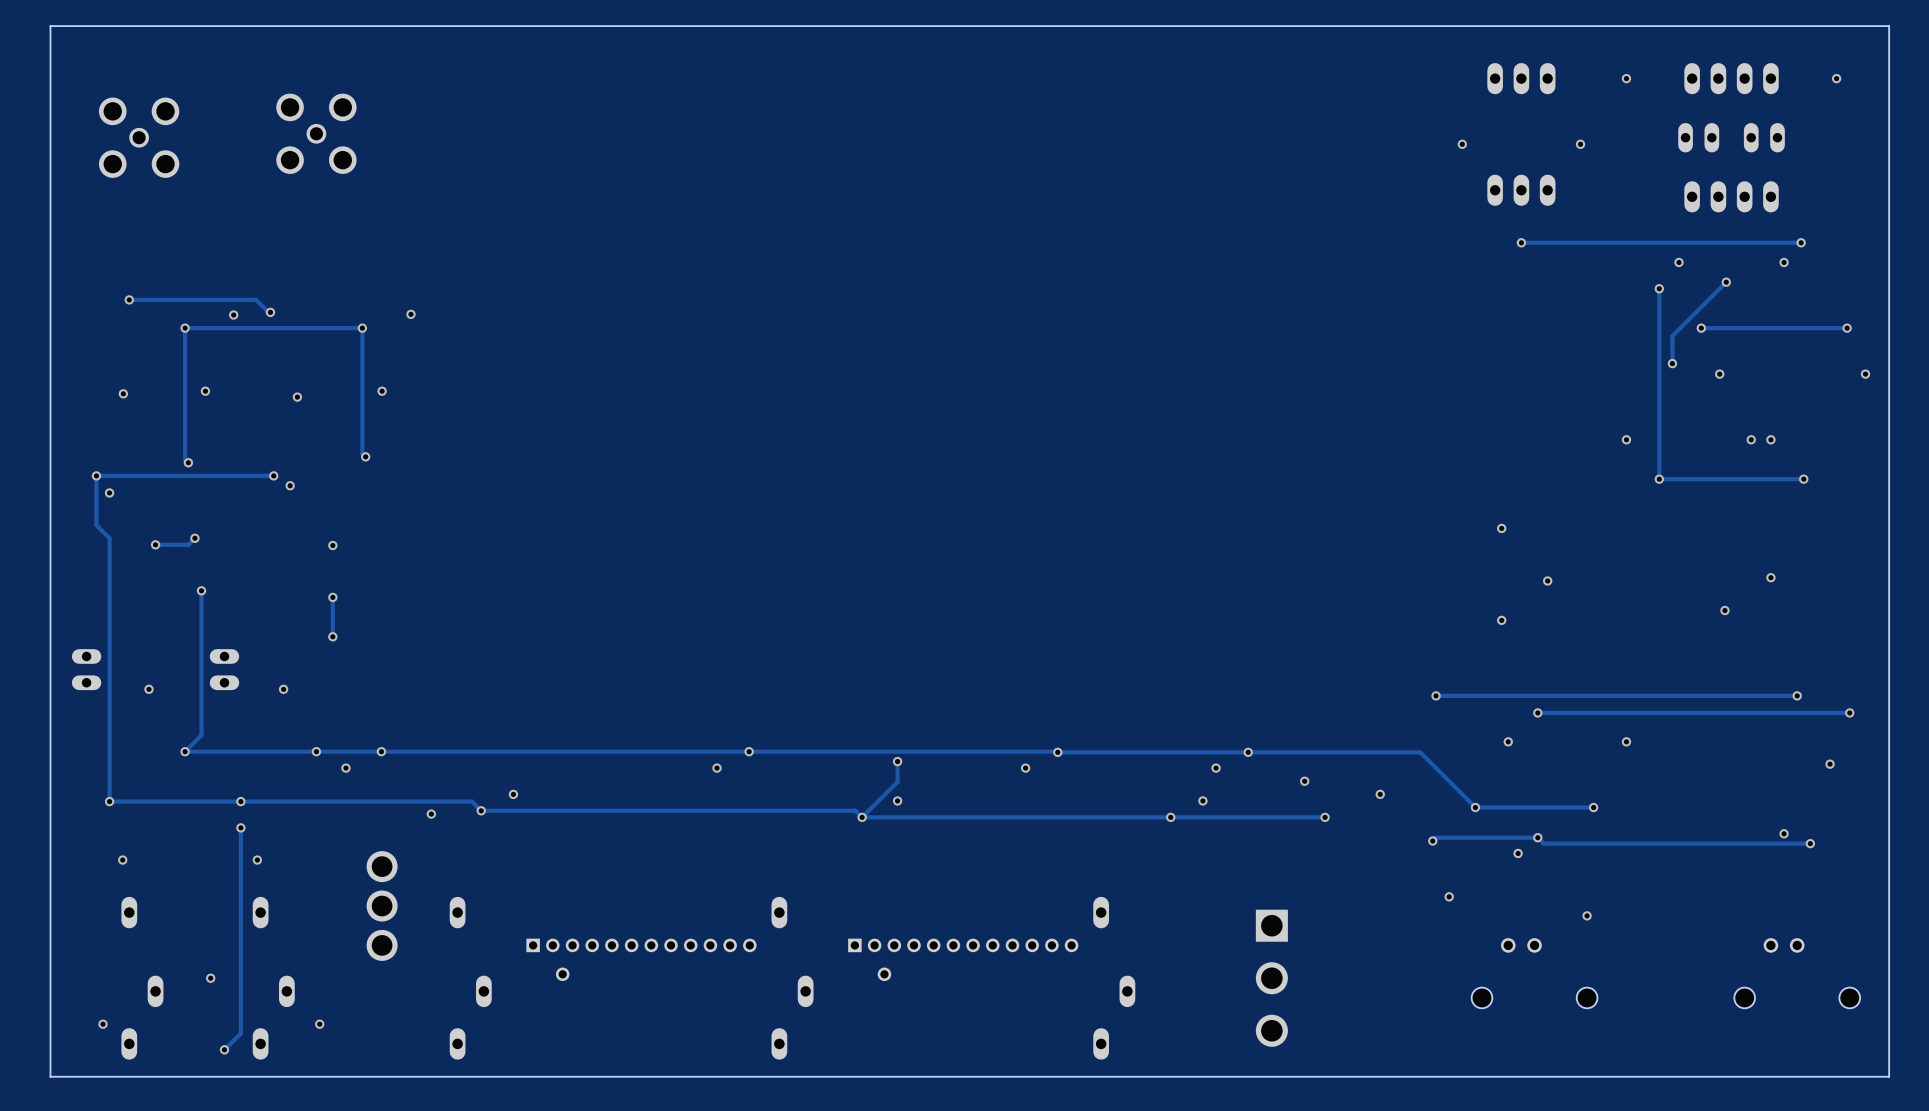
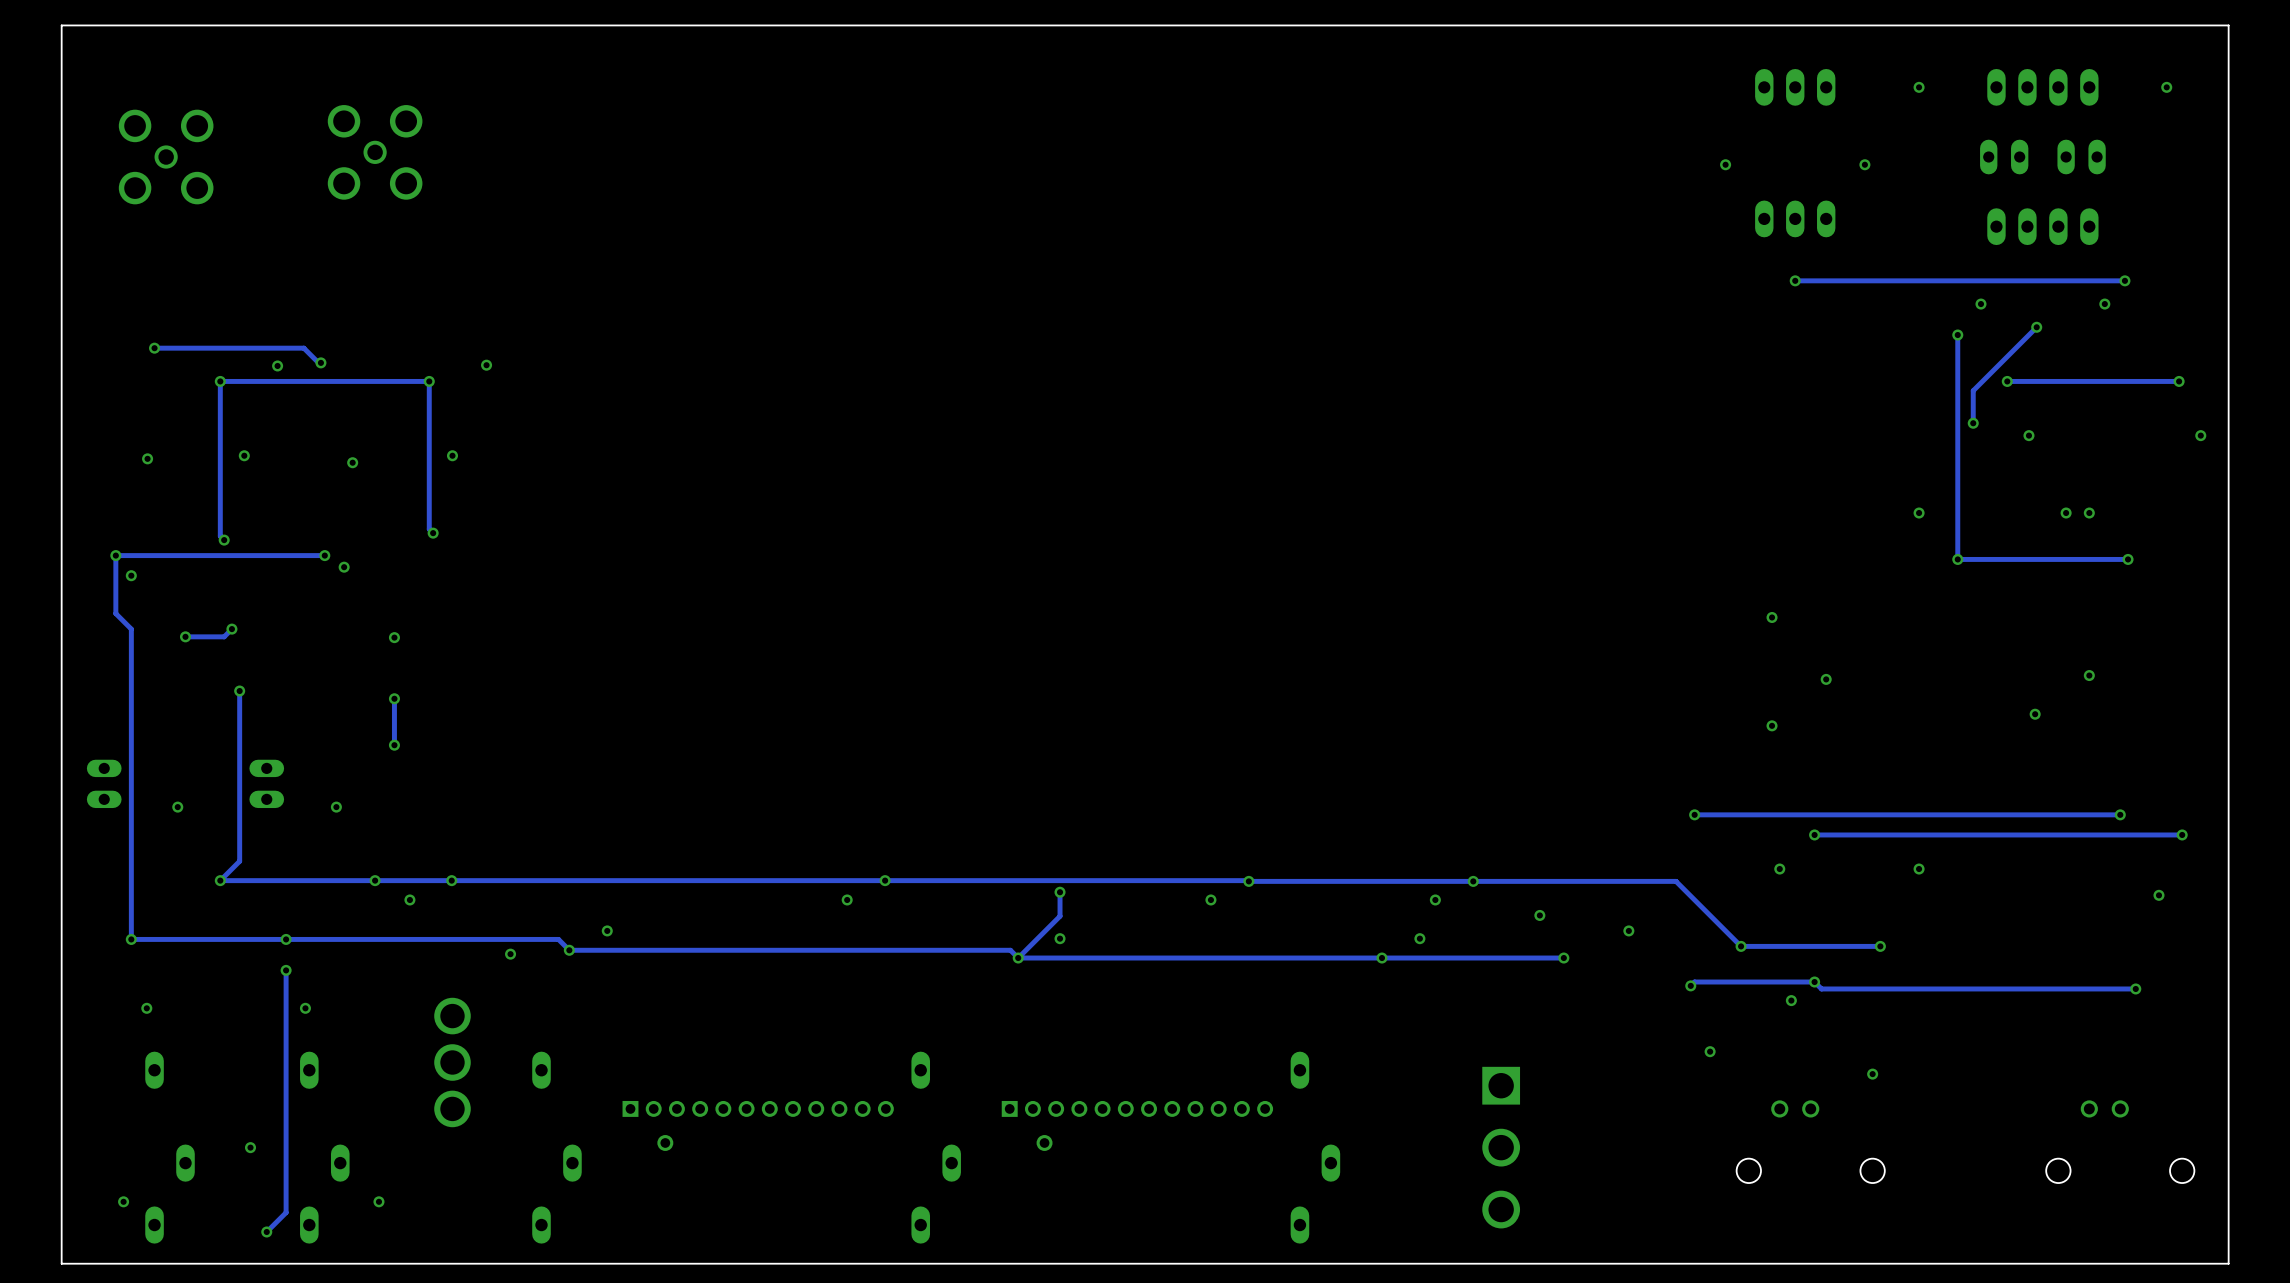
via: (1784, 833) -> none

